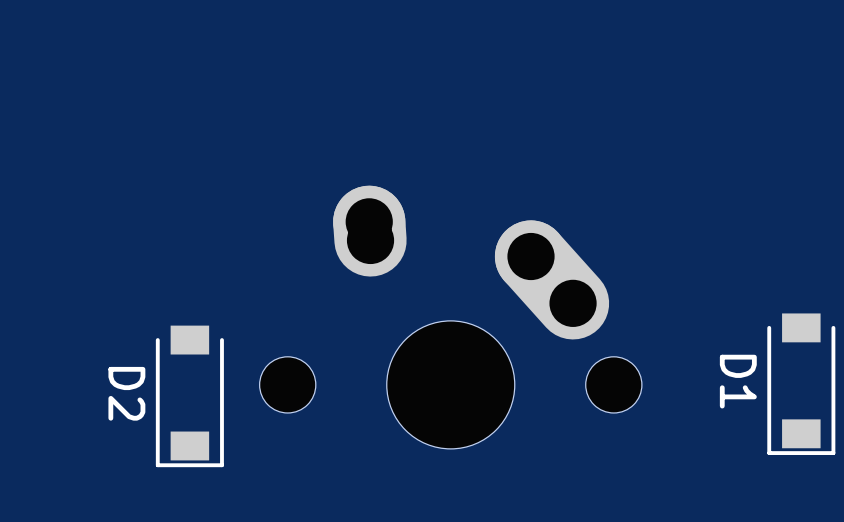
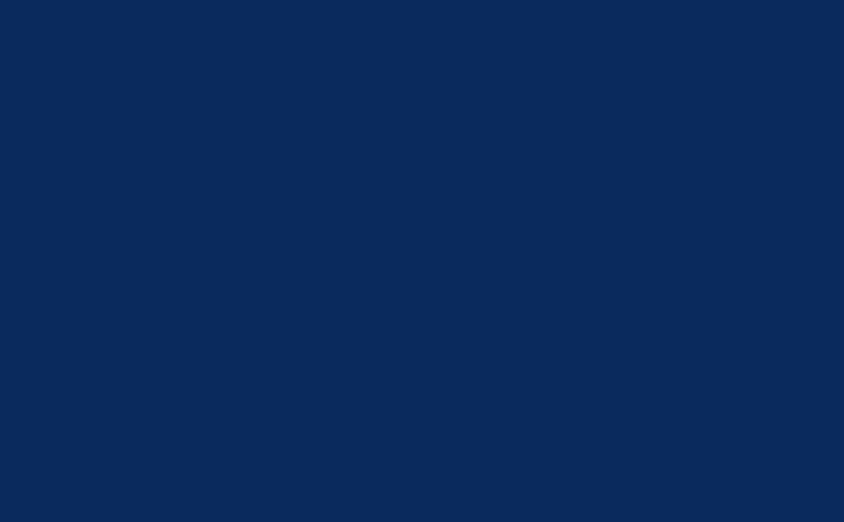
part: (450, 317) -> none
D1: (801, 384) -> none
D2: (189, 396) -> none

